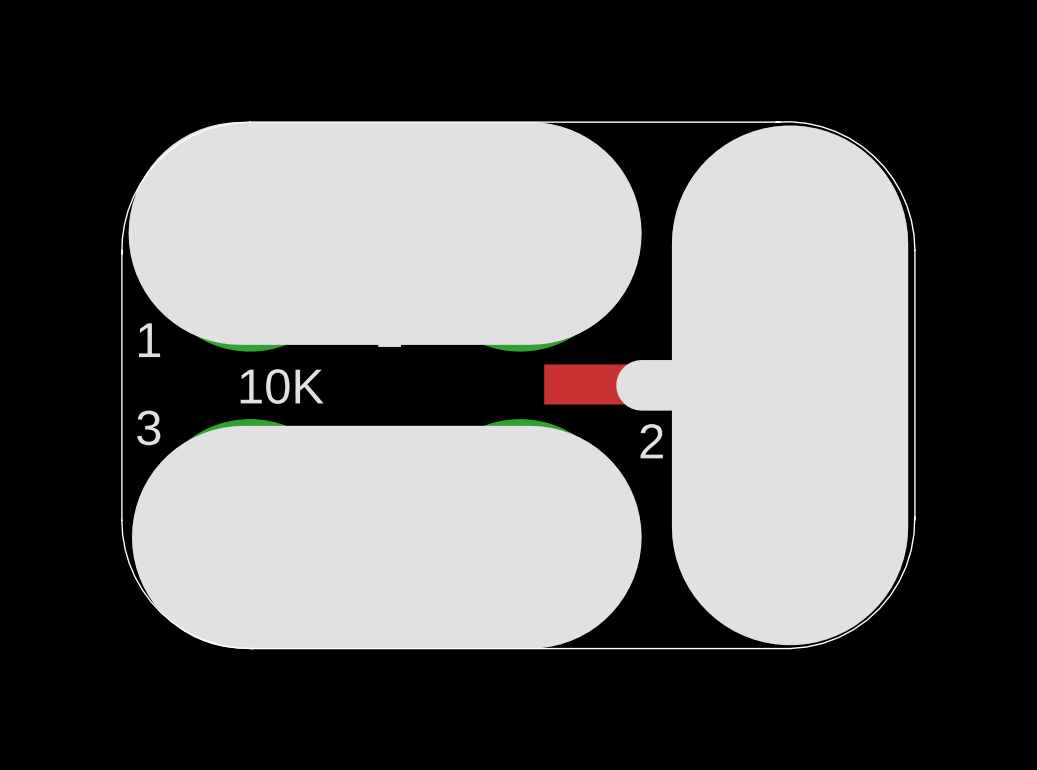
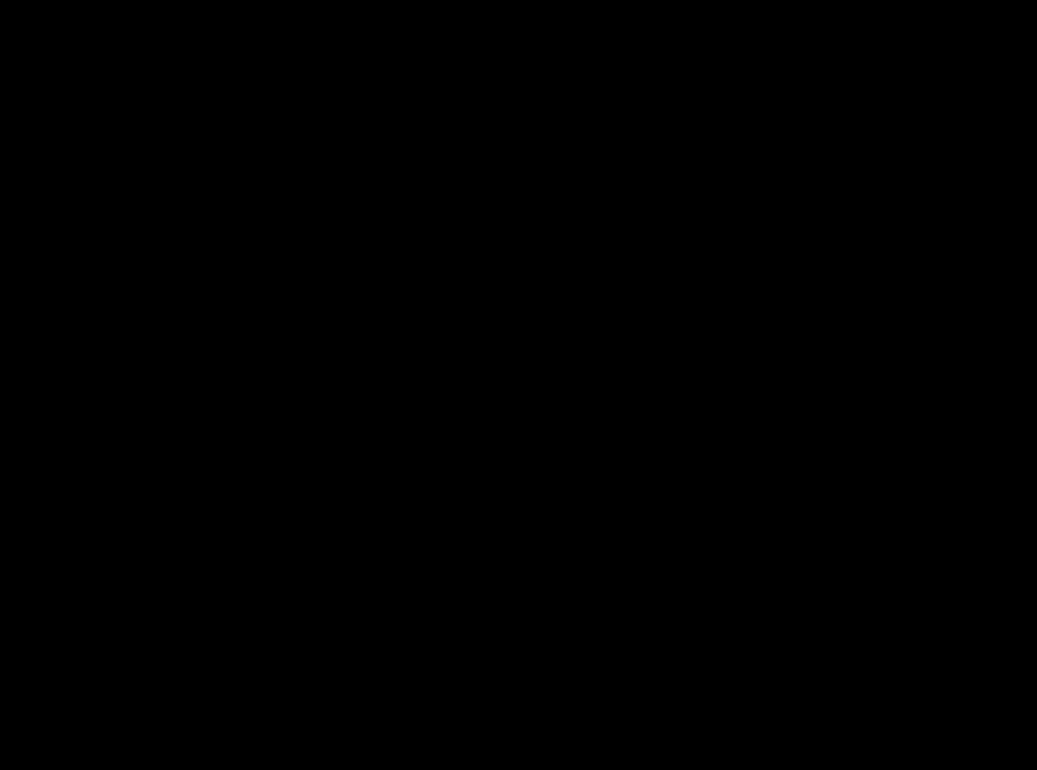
text: 2 (389, 329) -> none
part: (518, 385) -> none

